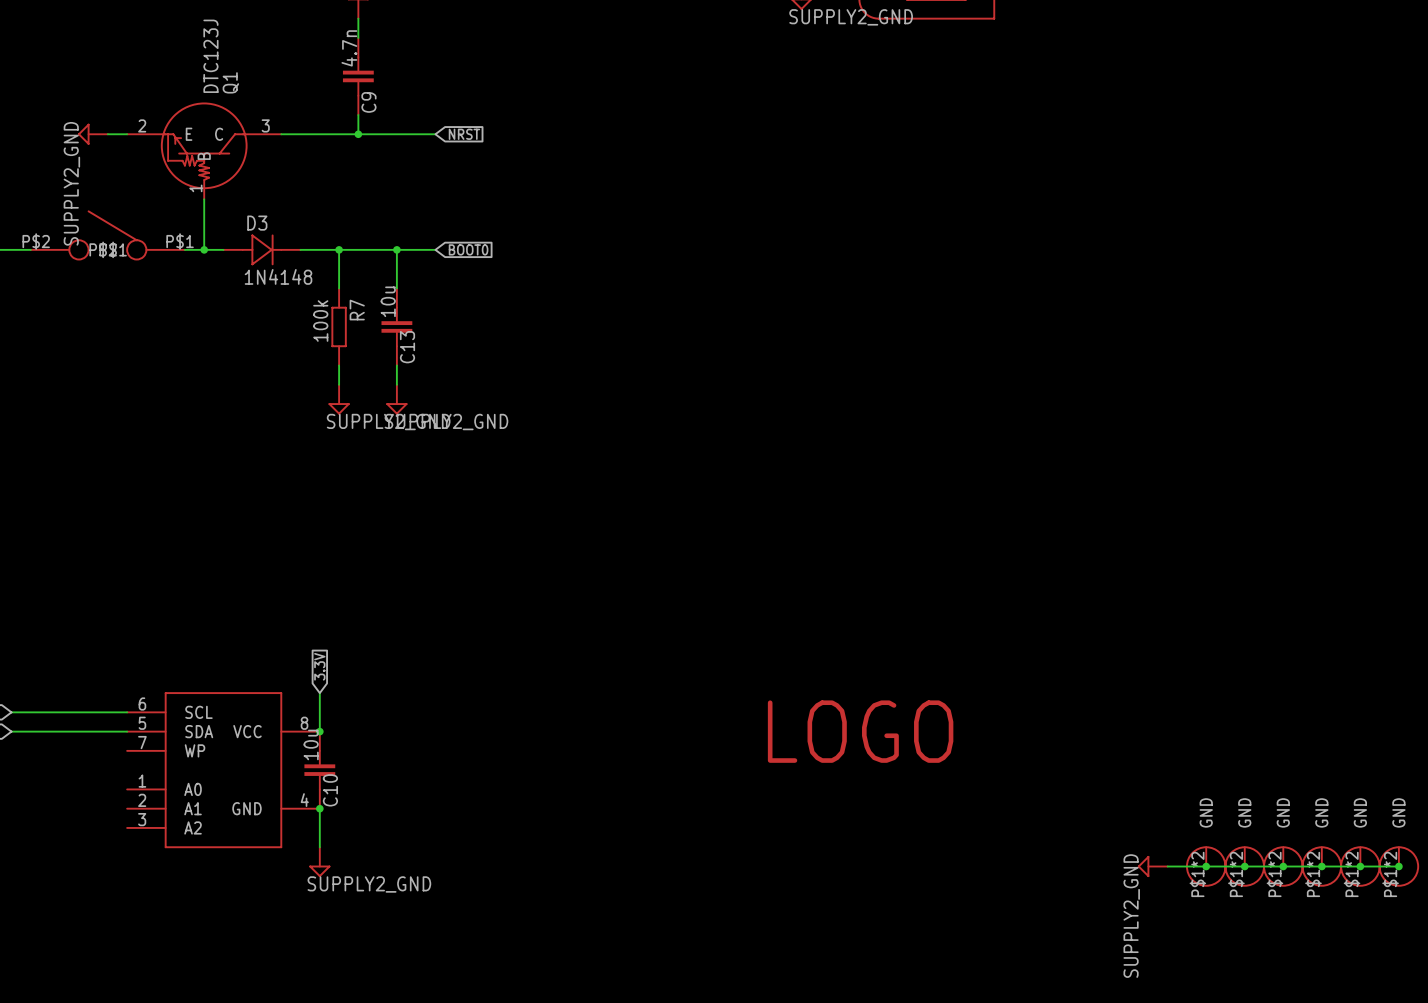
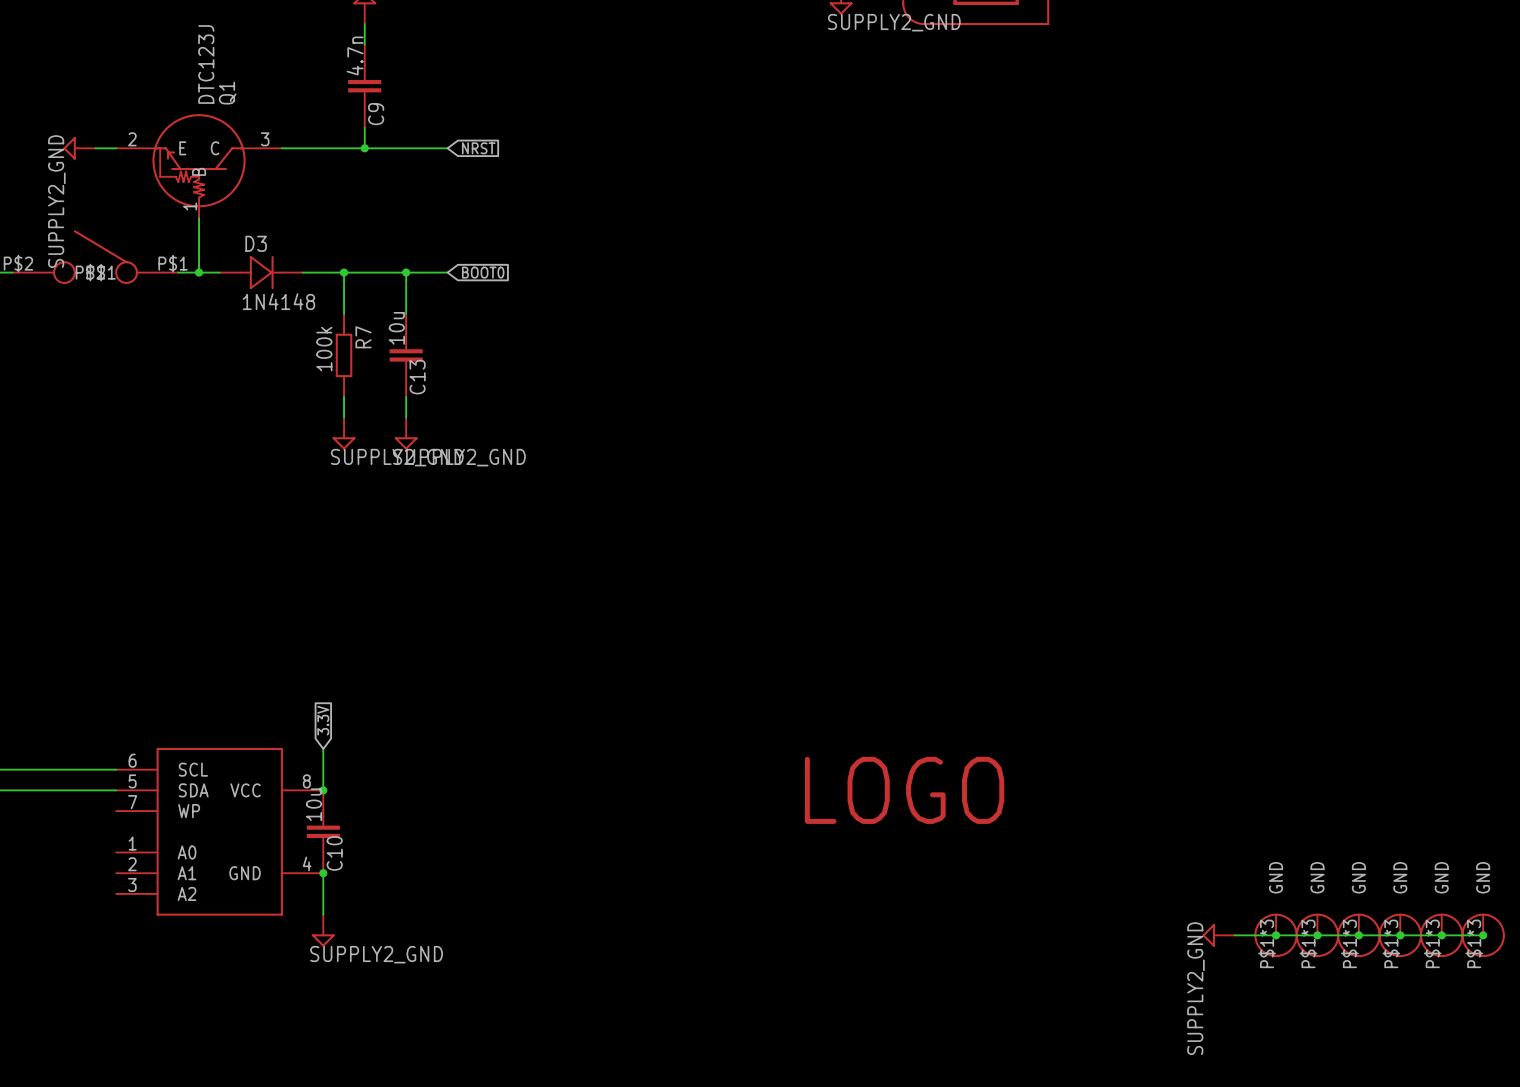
part pin number: P$1*2 (1197, 874) -> P$1*3 (1267, 943)
part pin number: P$1*2 (1236, 874) -> P$1*3 (1308, 943)
part pin number: P$1*2 (1274, 874) -> P$1*3 (1349, 943)
part pin number: P$1*2 (1313, 874) -> P$1*3 (1391, 943)
part pin number: P$1*2 (1352, 874) -> P$1*3 (1432, 943)
part pin number: P$1*2 (1390, 874) -> P$1*3 (1474, 943)

